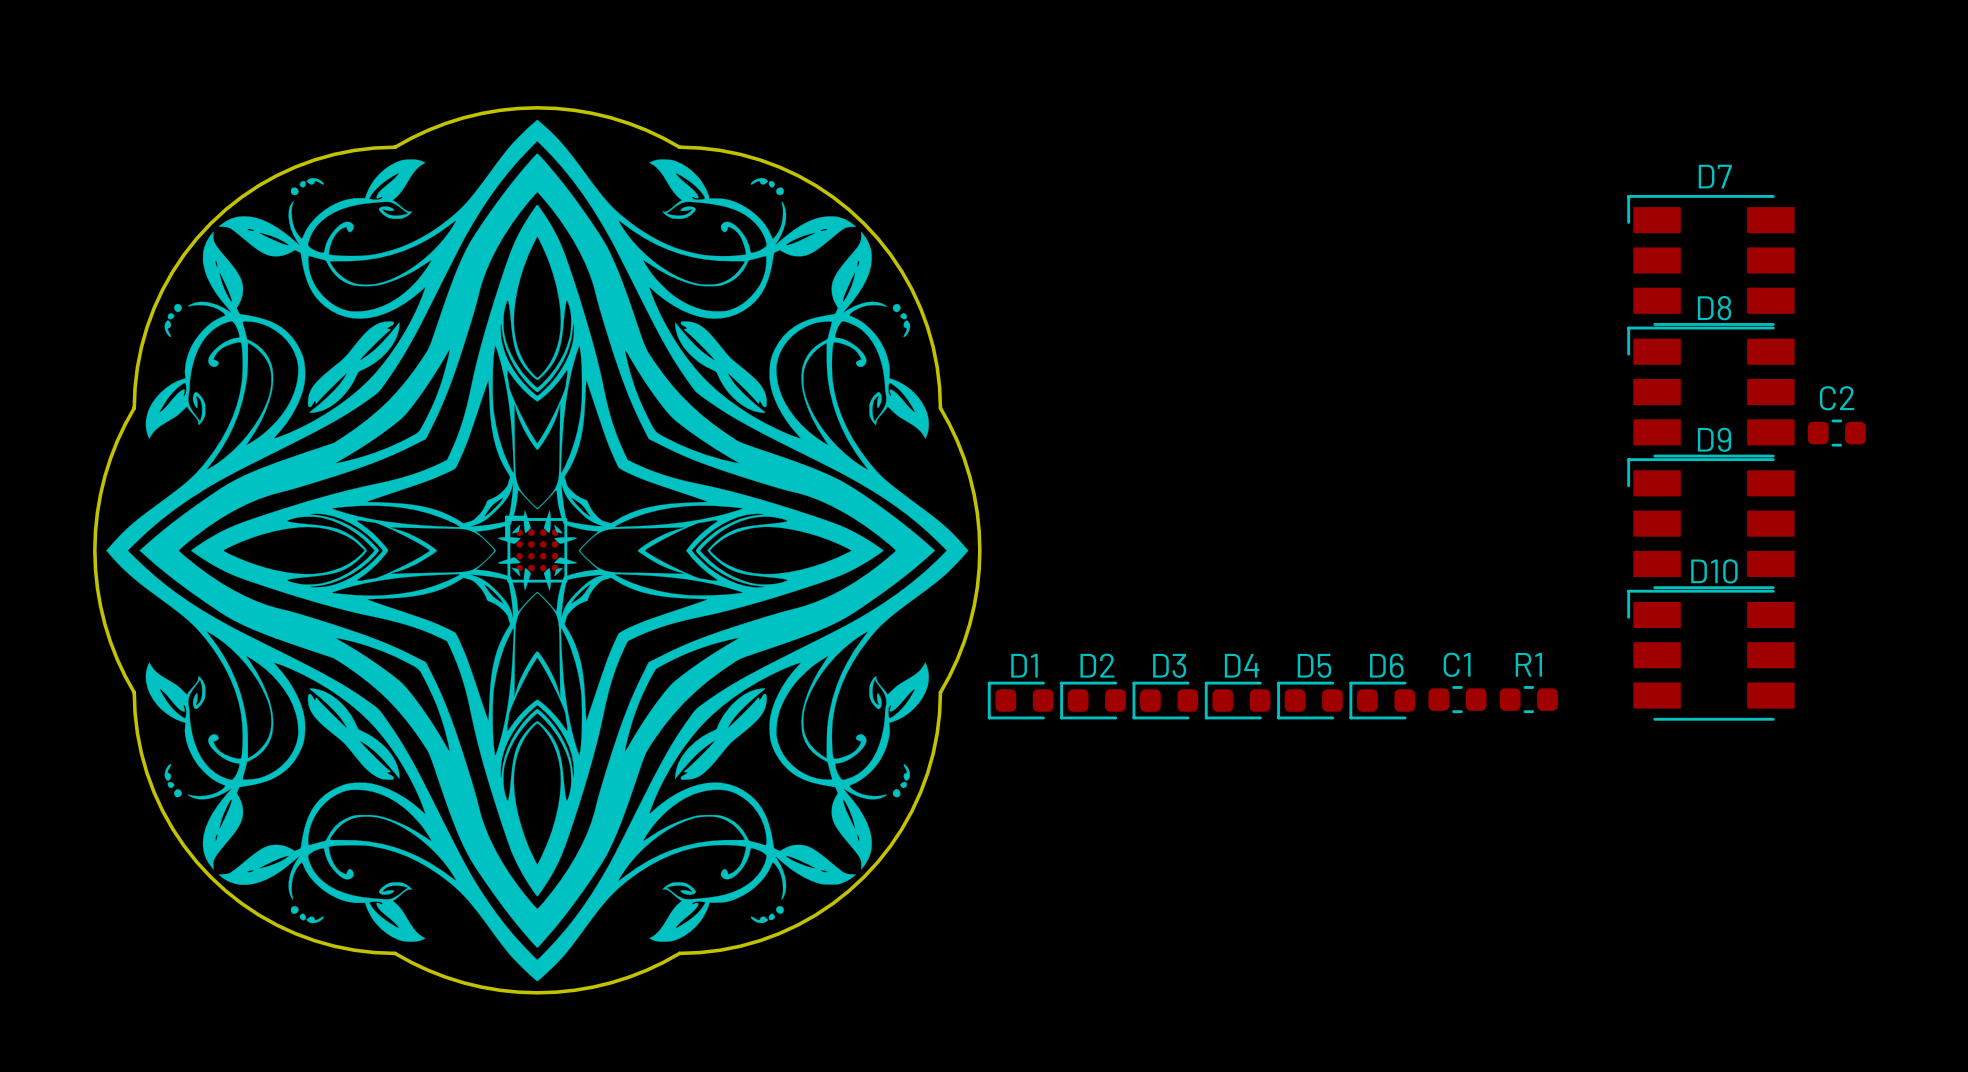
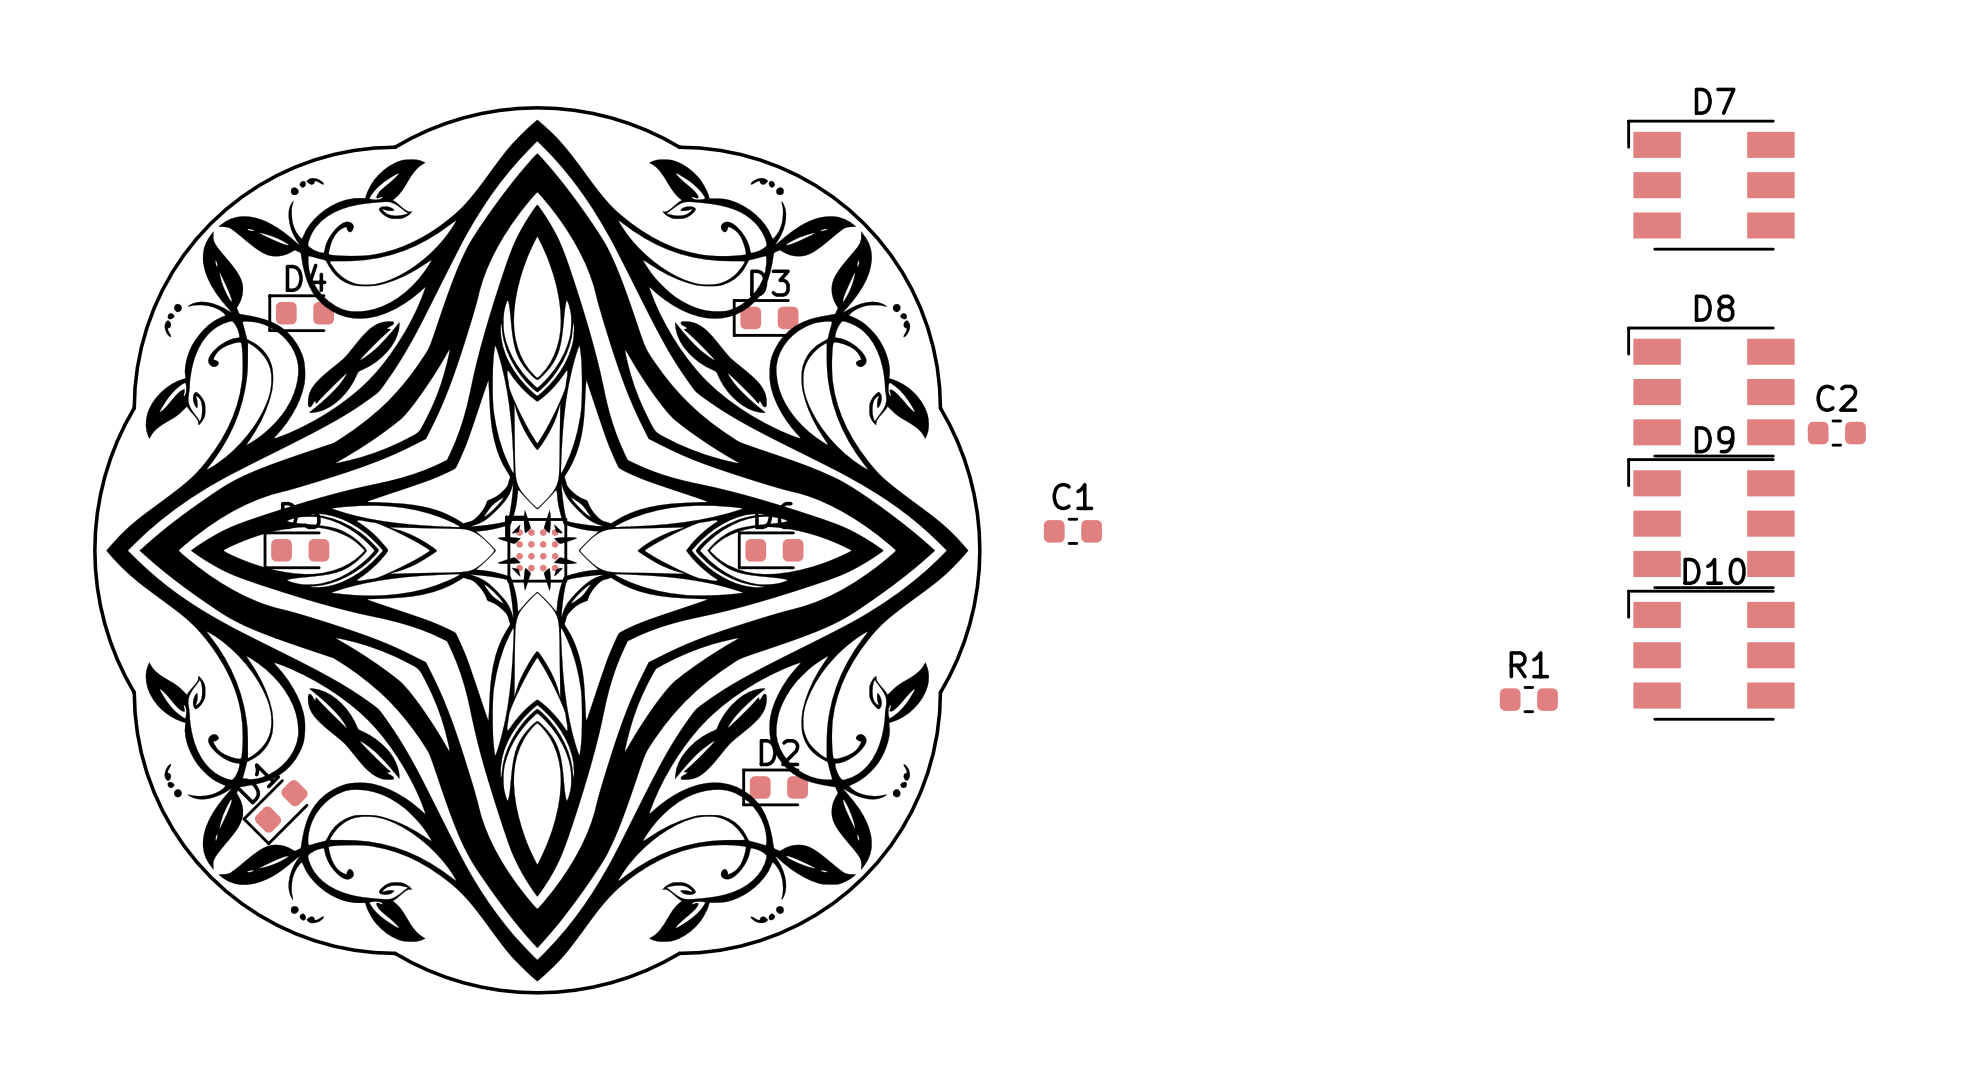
D7 position: (1710, 260) -> (1710, 185)
C1 position: (1457, 699) -> (1072, 531)
D1 rotation: 0° (1020, 700) -> 45° counterclockwise (275, 812)
D1 position: (1020, 700) -> (275, 812)
D2 position: (1093, 700) -> (775, 787)
D3 position: (1165, 700) -> (765, 317)
D4 position: (1237, 700) -> (301, 313)
D5 position: (1309, 700) -> (296, 550)
D6 position: (1382, 700) -> (770, 550)

